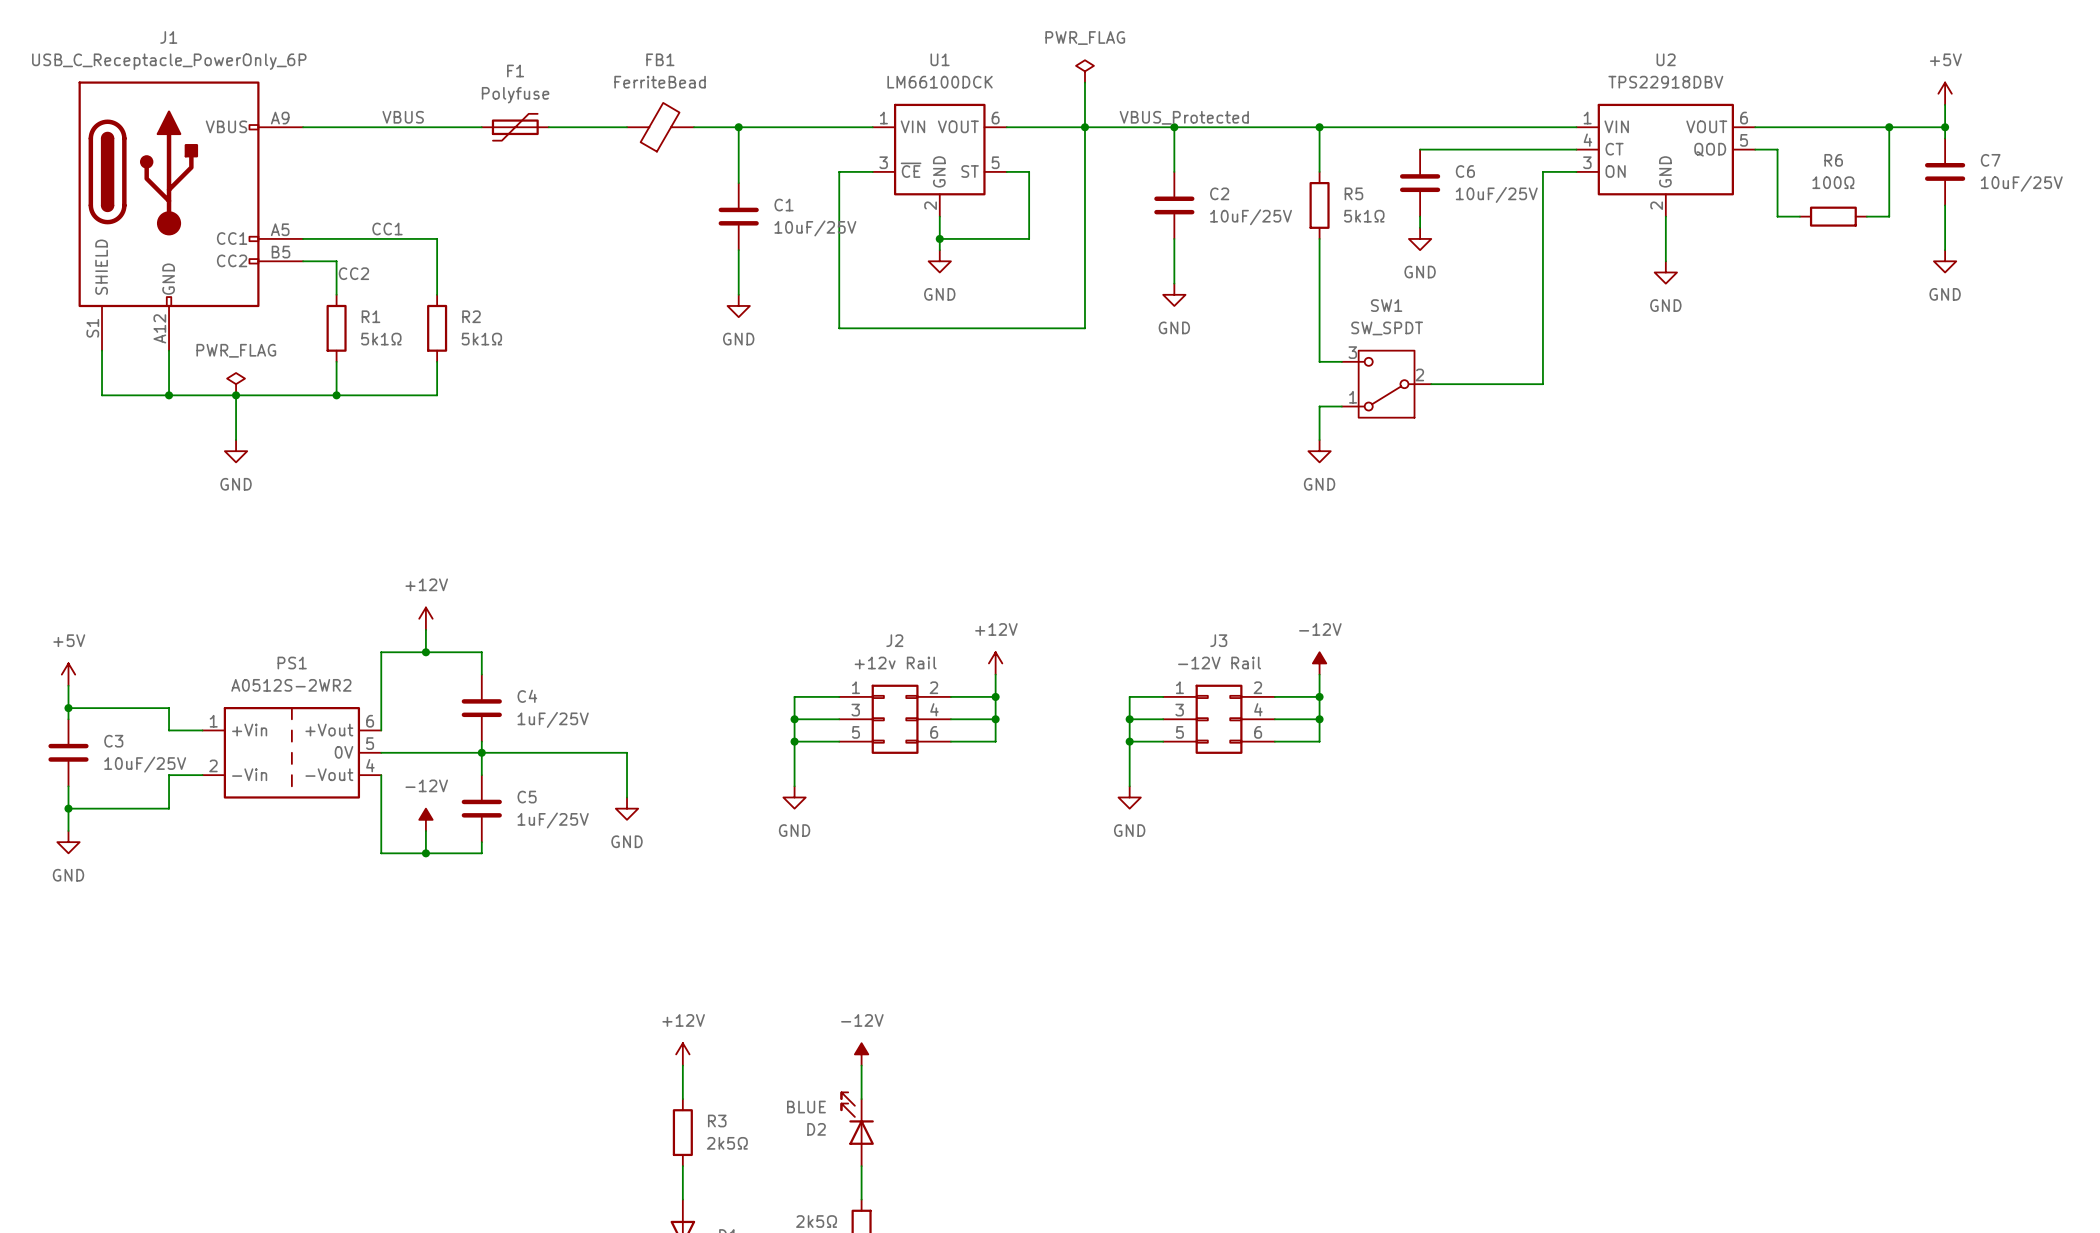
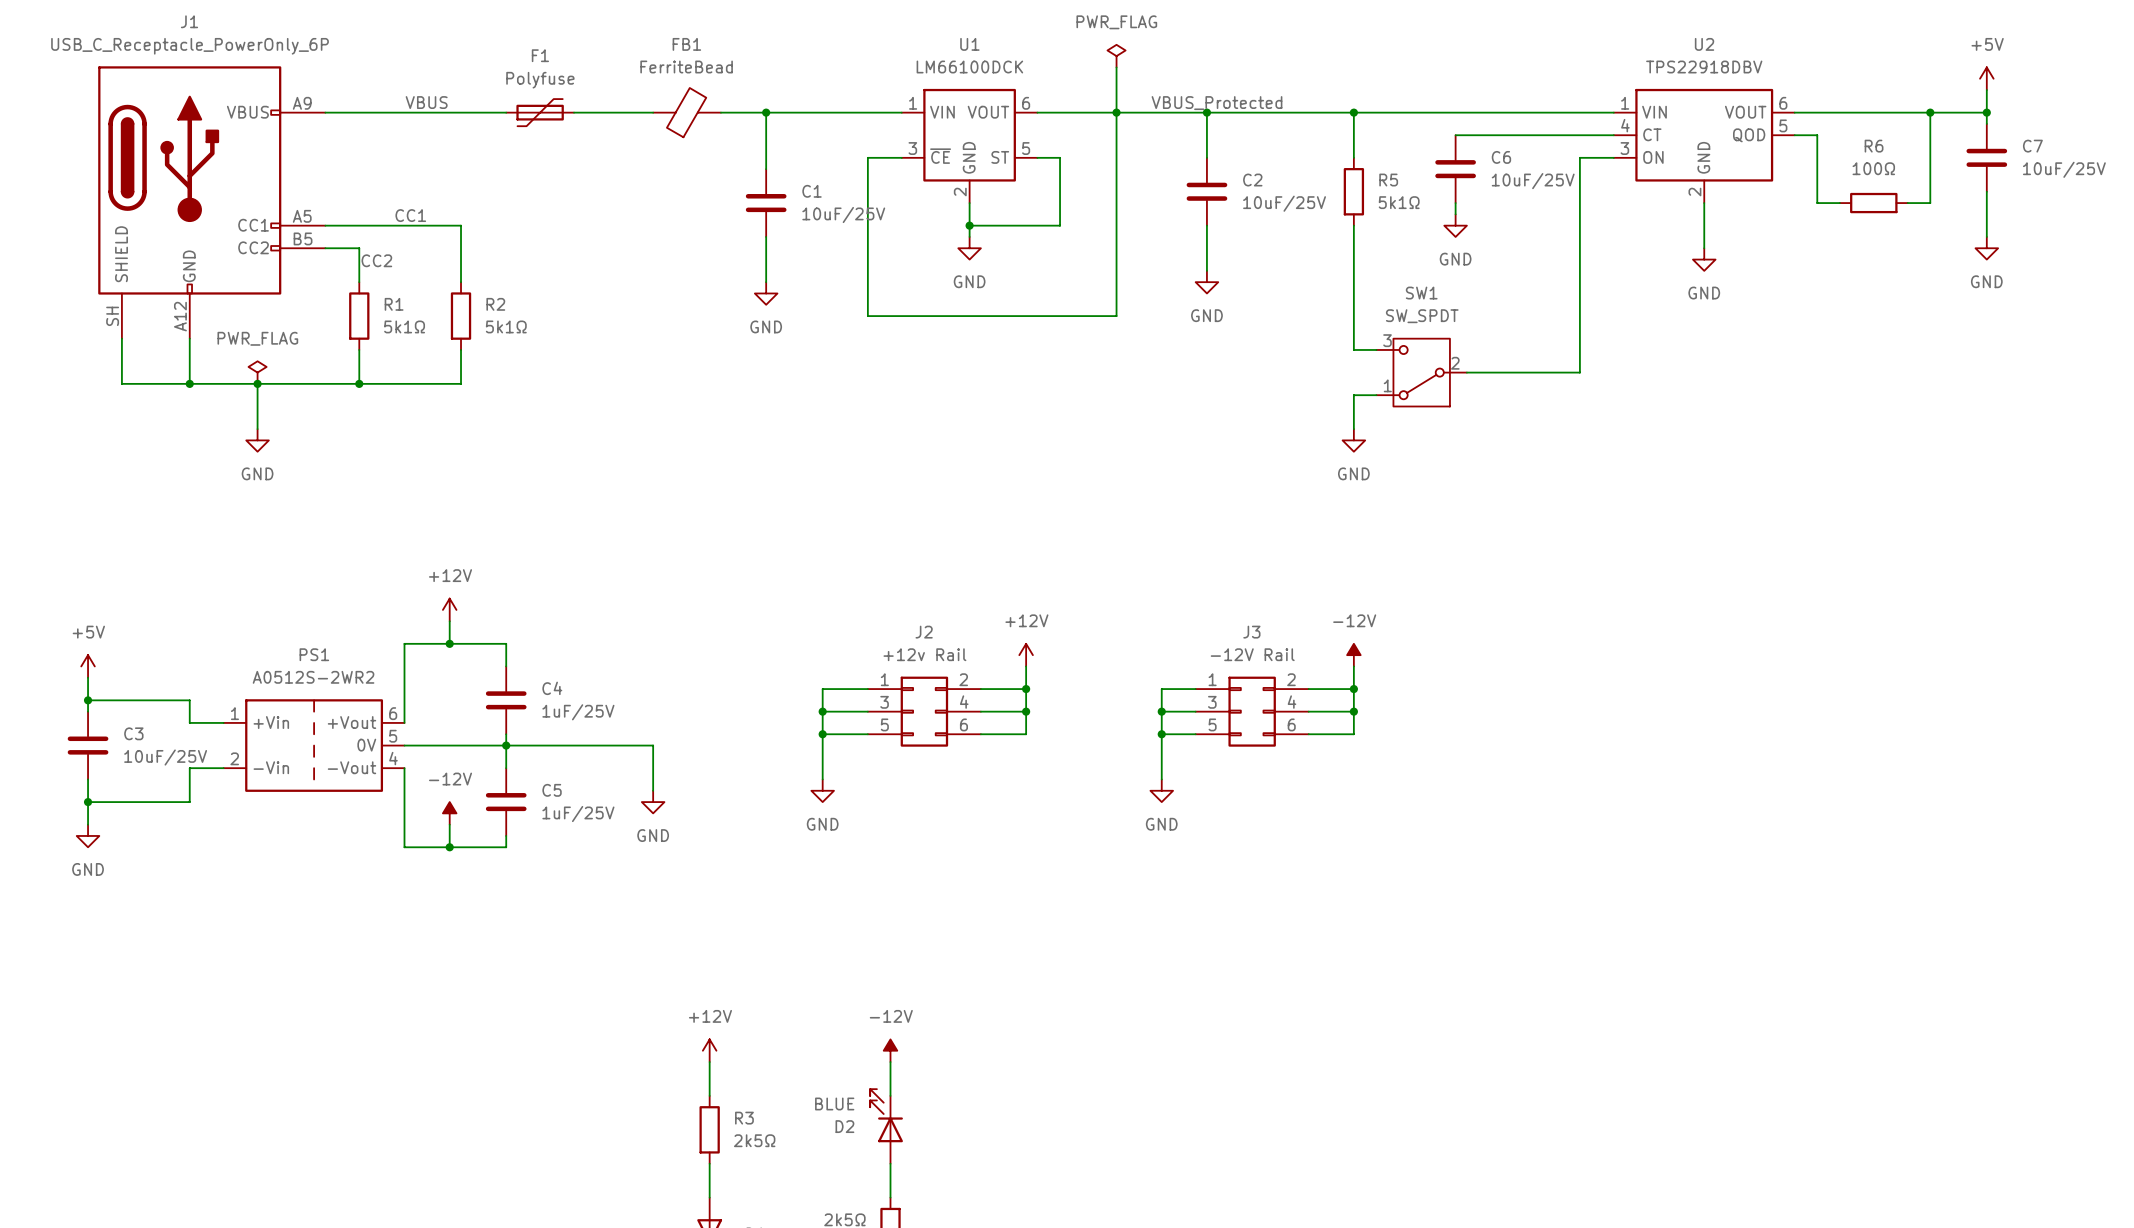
J1 pin number: S1 (92, 328) -> SH (112, 316)

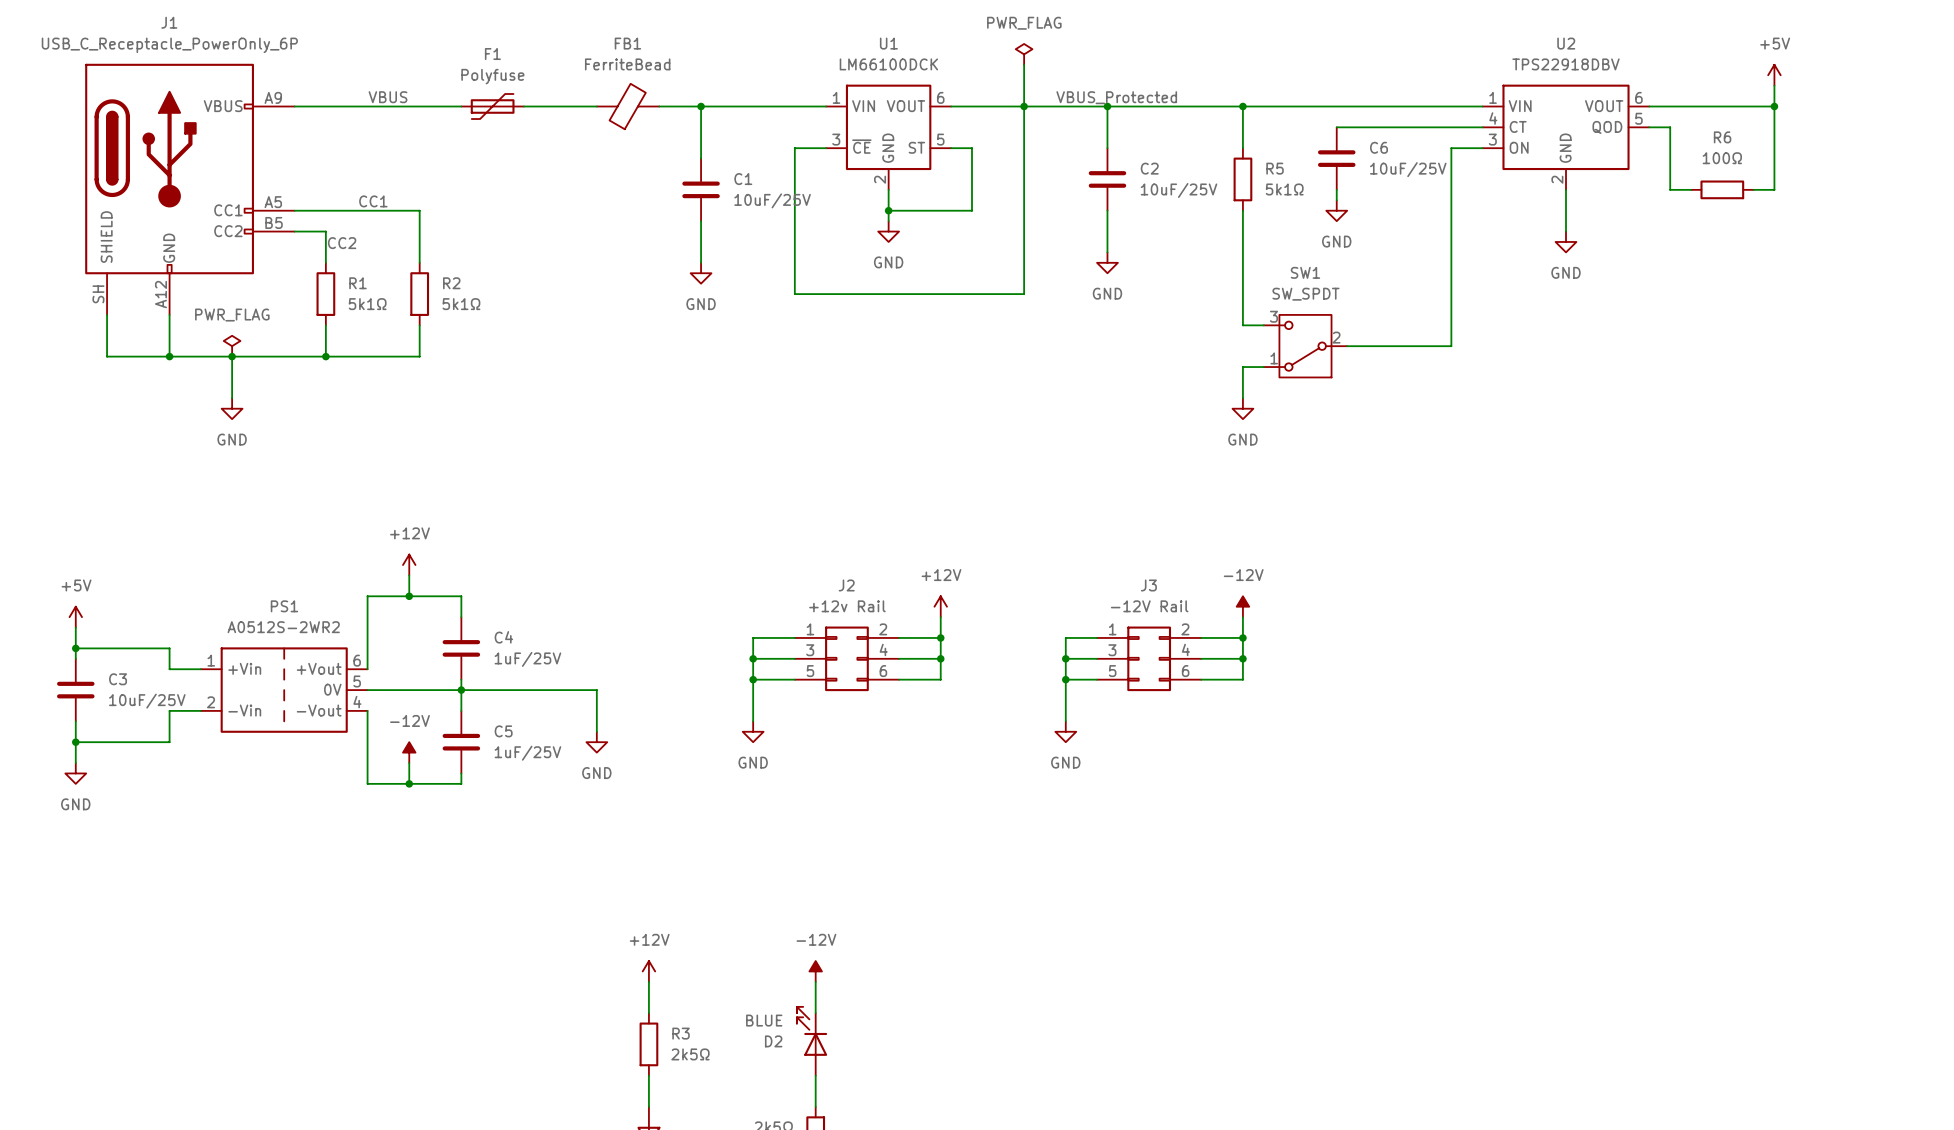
power symbol position: +5V (1986, 78) -> +5V (1774, 75)
wire: (1986, 90) (1986, 123) -> none
wire: (1930, 112) (1986, 112) -> (1774, 106) (1774, 85)
junction: (1986, 112) -> none
C7: 10uF/25V (1986, 157) -> none
wire: (1986, 191) (1986, 236) -> none
power symbol: GND (1986, 248) -> none

